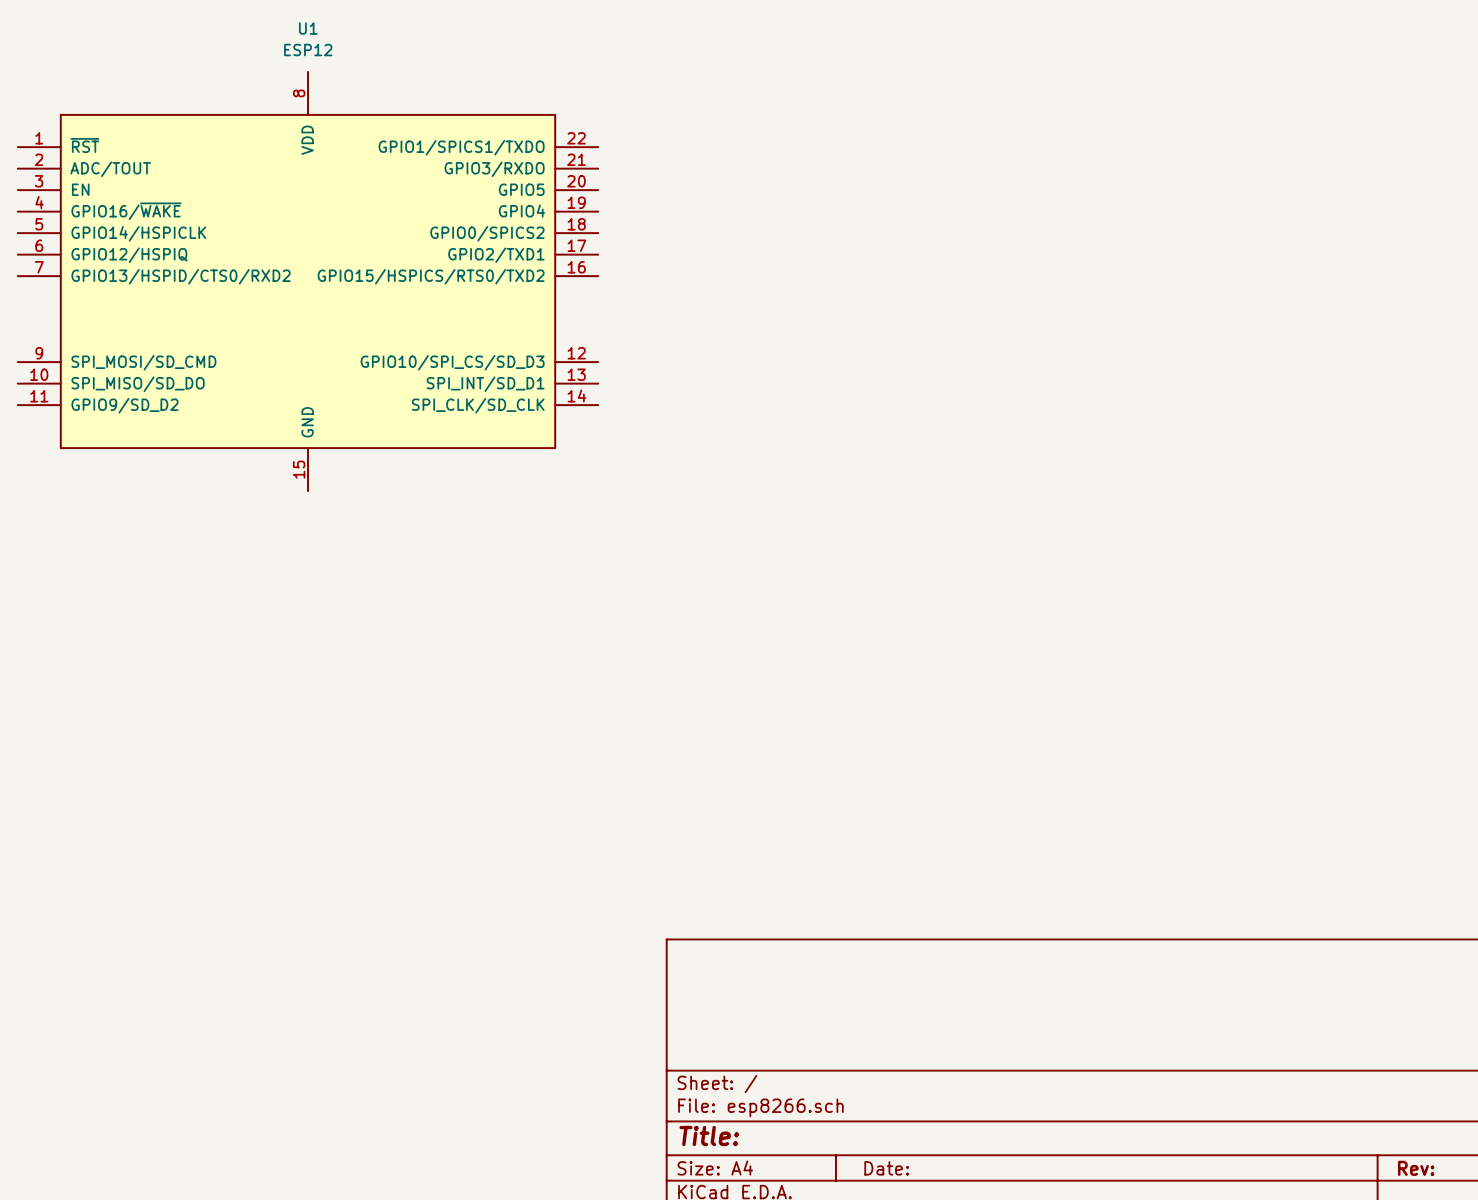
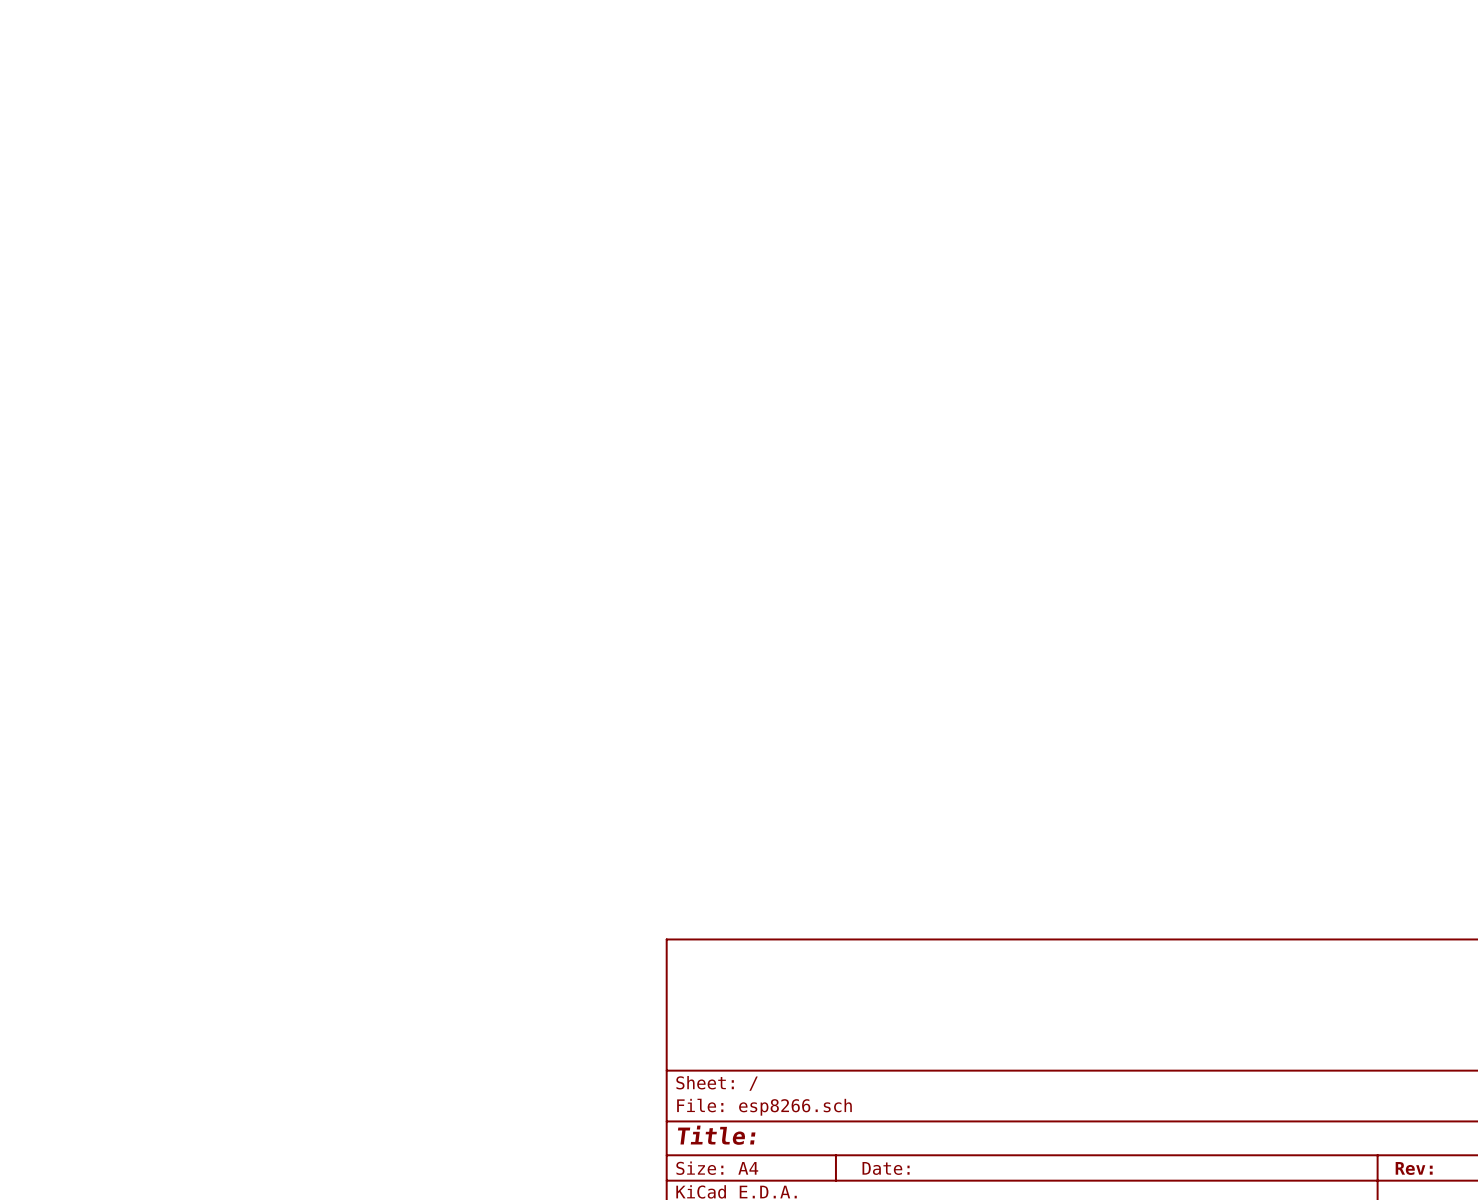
U1: ESP12 (308, 281) -> none

